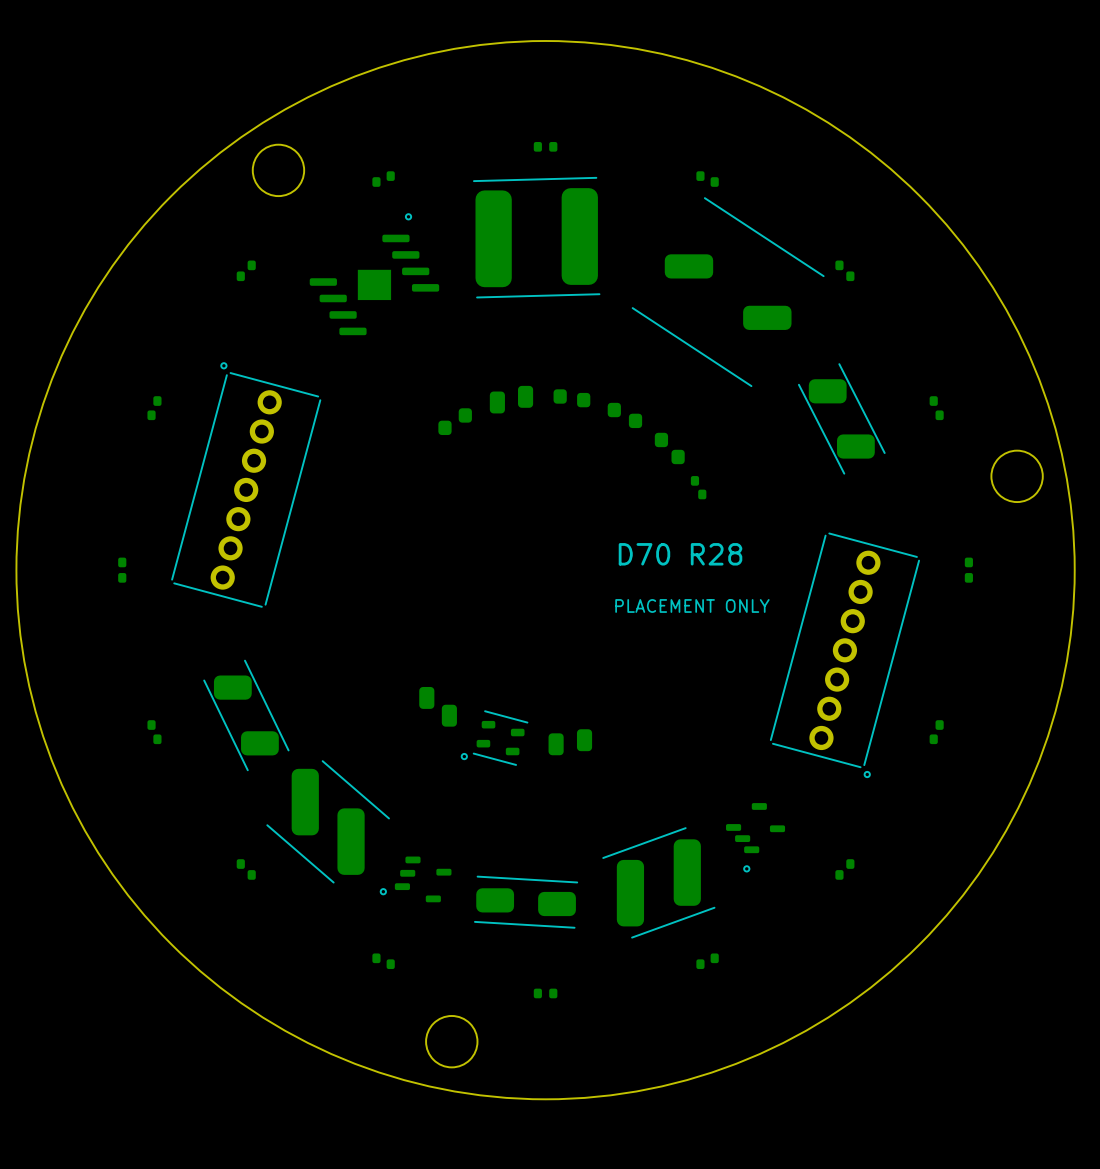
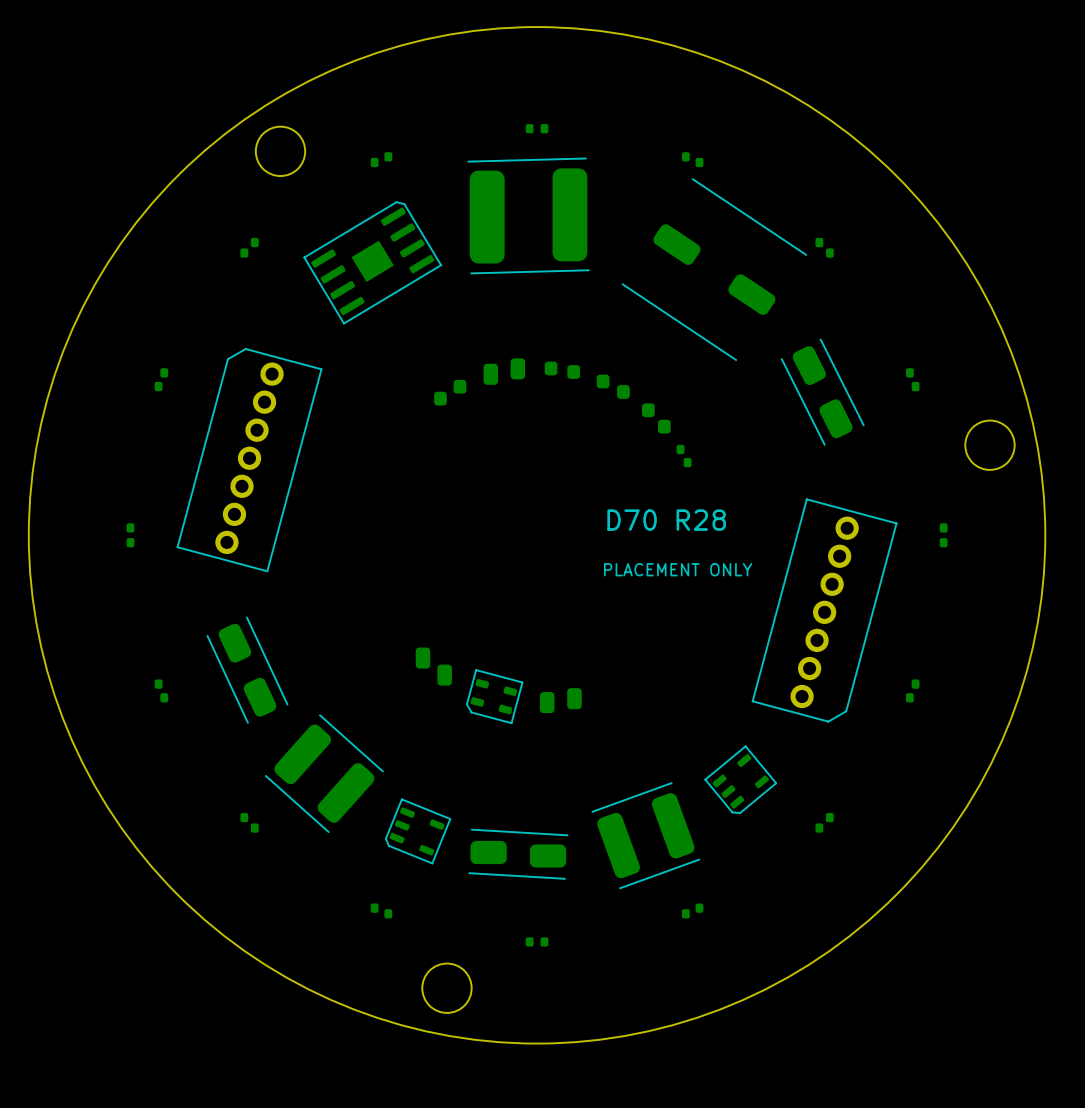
part footprint: [631, 197, 825, 388] -> [621, 178, 808, 361]
part footprint: [309, 213, 440, 336] -> [303, 201, 442, 325]
part footprint: [171, 362, 322, 608] -> [176, 348, 323, 573]
part footprint: [798, 363, 886, 475] -> [780, 338, 865, 446]
part footprint: [769, 532, 920, 779] -> [751, 498, 898, 723]
part footprint: [203, 659, 290, 772] -> [206, 616, 289, 724]
part footprint: [460, 710, 529, 766] -> [466, 669, 524, 725]
part footprint: [266, 760, 390, 884] -> [264, 714, 384, 833]
part footprint: [726, 803, 786, 873] -> [704, 745, 778, 814]
part footprint: [602, 827, 716, 939] -> [591, 782, 701, 890]
part footprint: [379, 856, 452, 903] -> [385, 798, 452, 865]

